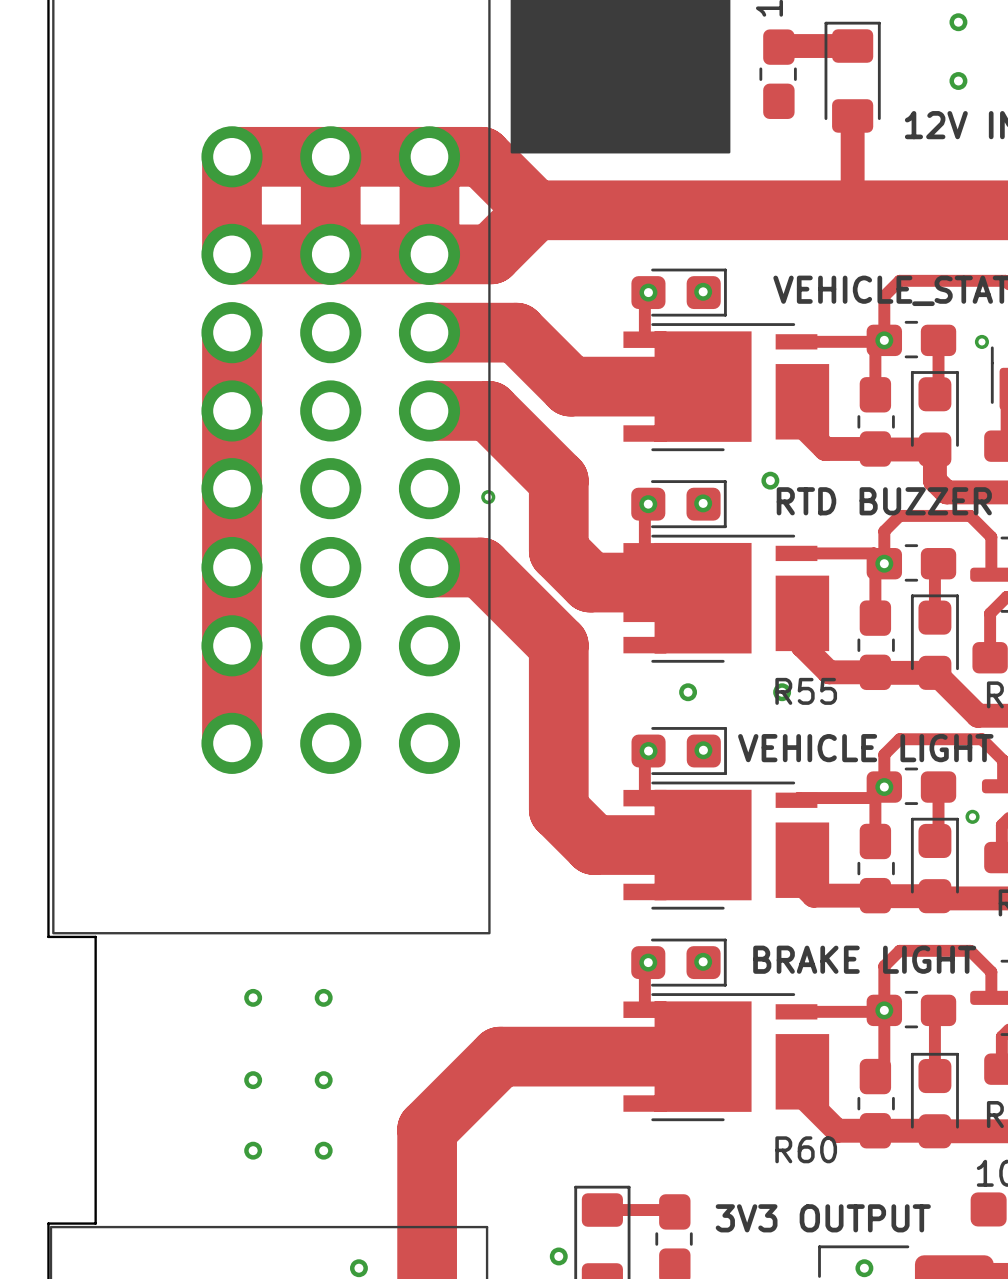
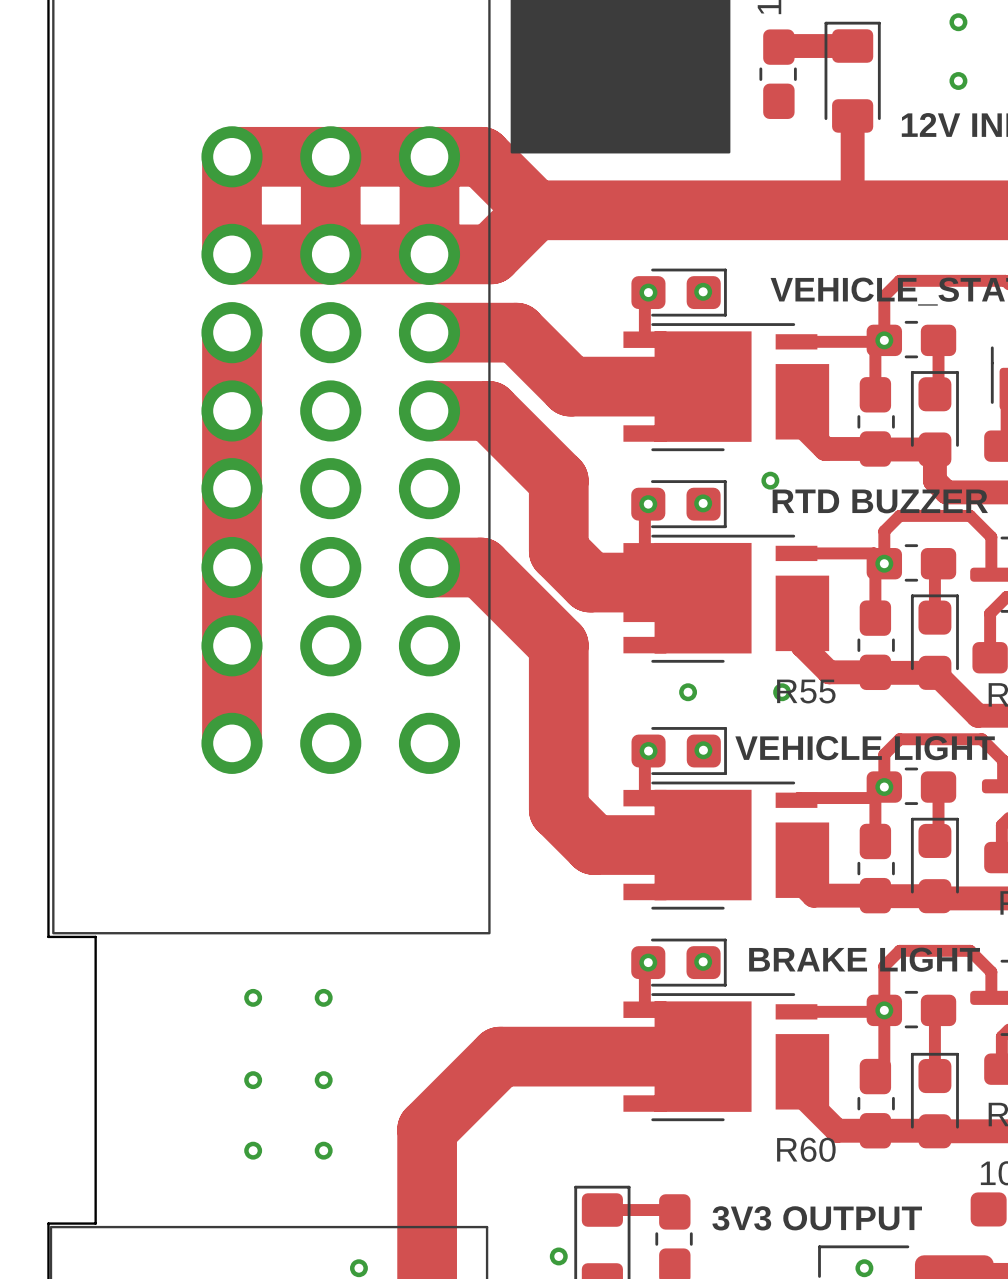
via: (981, 341) -> none
via: (488, 497) -> none
via: (972, 816) -> none

